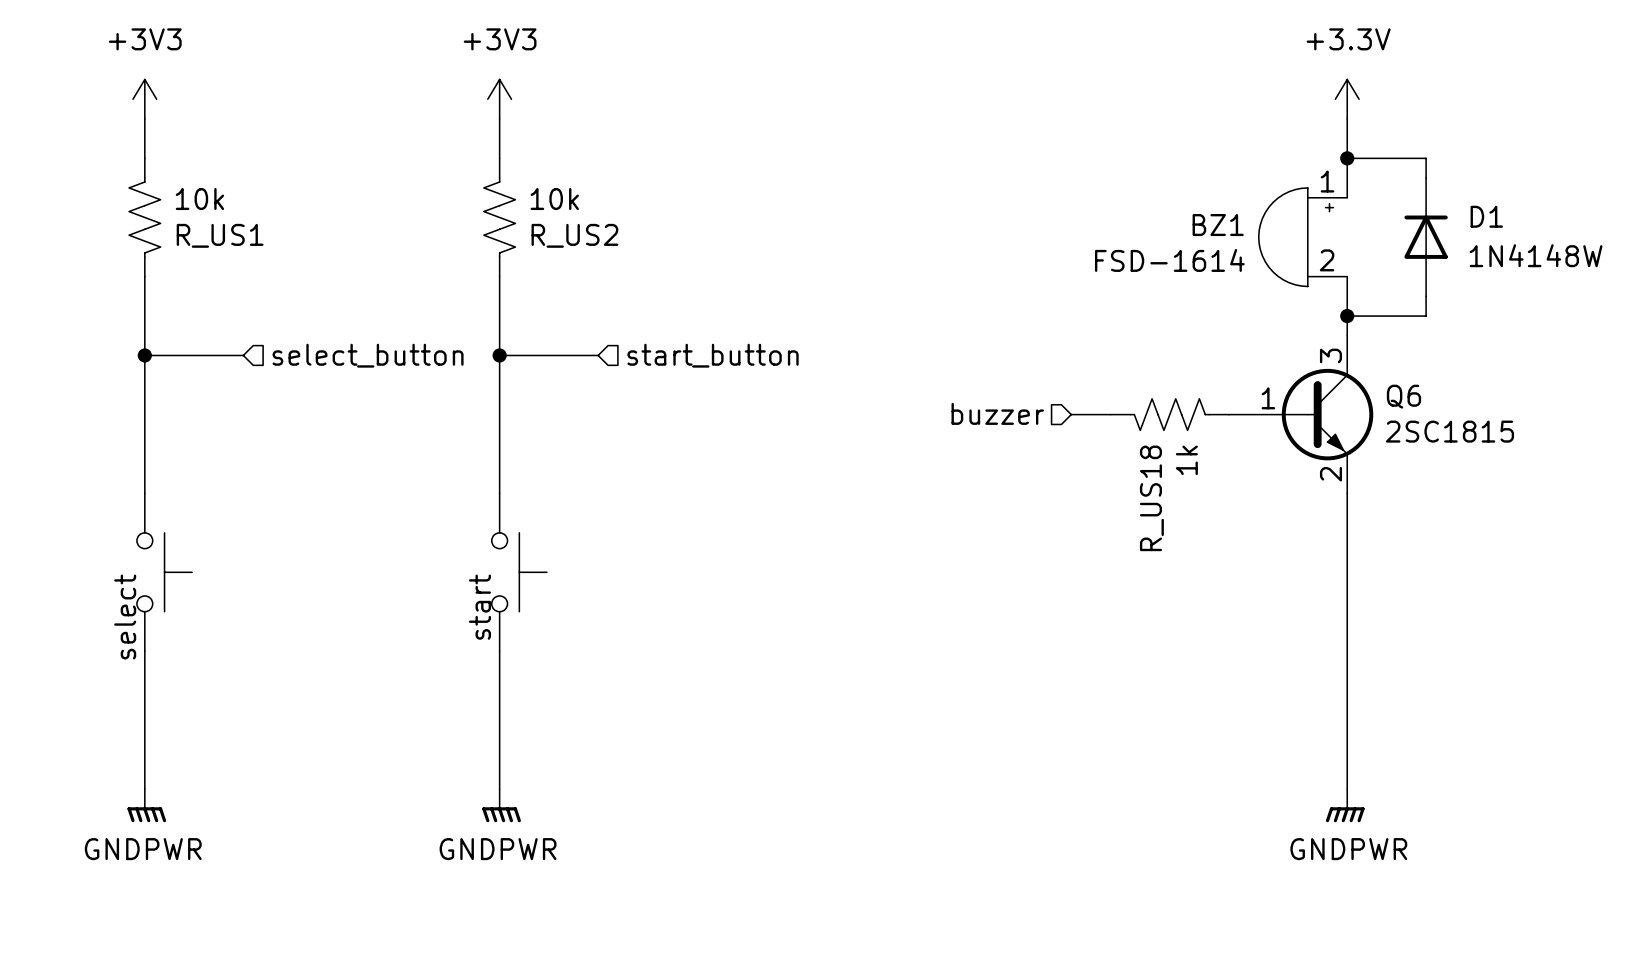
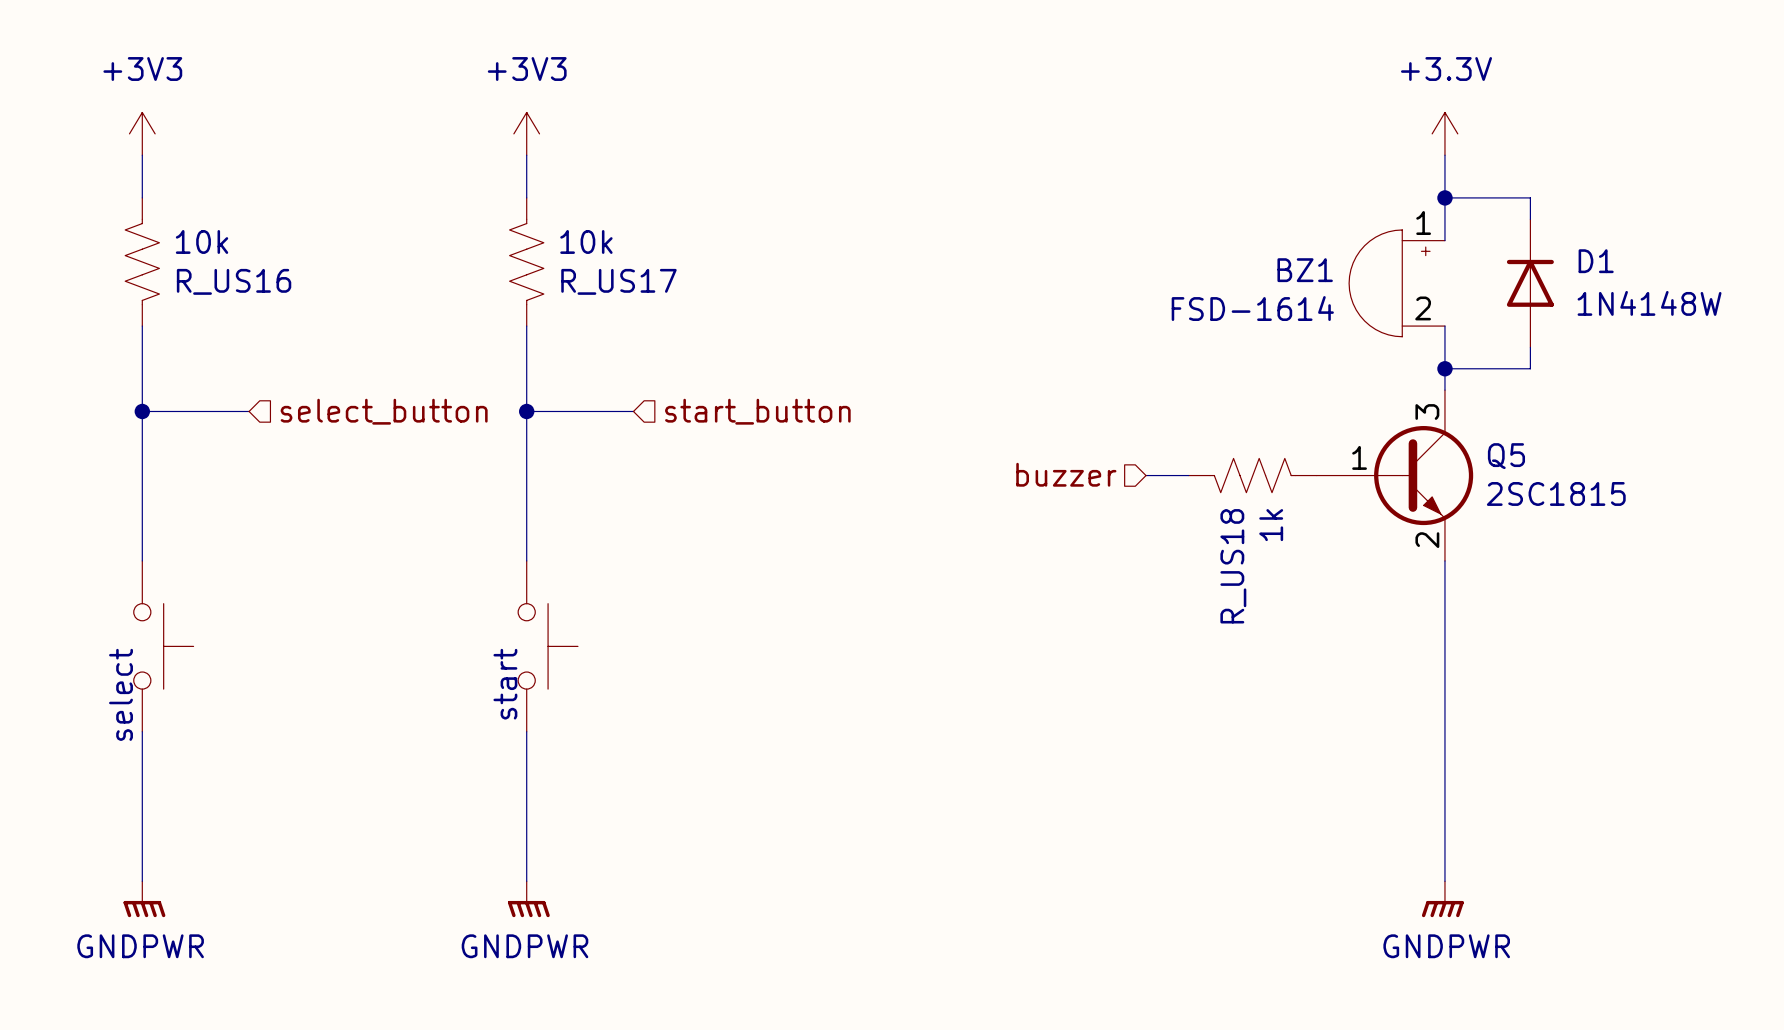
R_US1 name: R_US1 (220, 235) -> R_US16 (234, 281)
R_US2 name: R_US2 (574, 235) -> R_US17 (618, 281)
Q6 name: Q6 (1403, 396) -> Q5 (1506, 456)

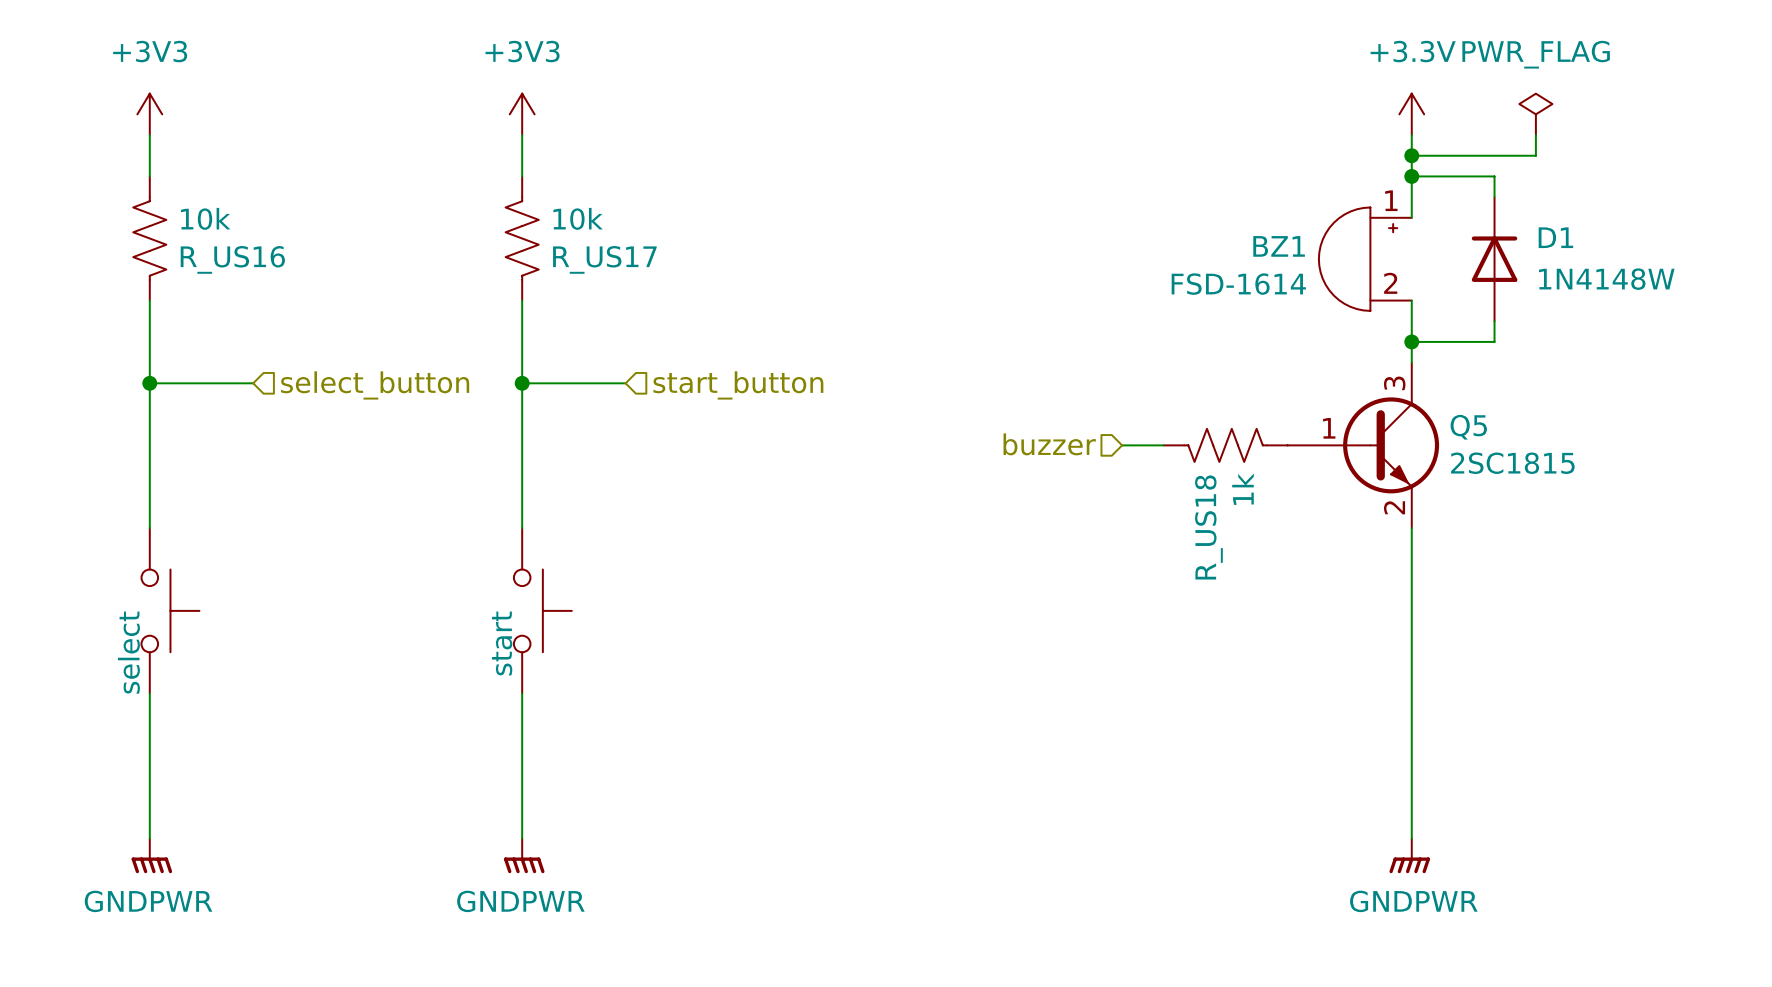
power symbol: none -> PWR_FLAG (1535, 114)
wire: none -> (1535, 135) (1535, 155) (1411, 155)
junction: none -> (1411, 155)

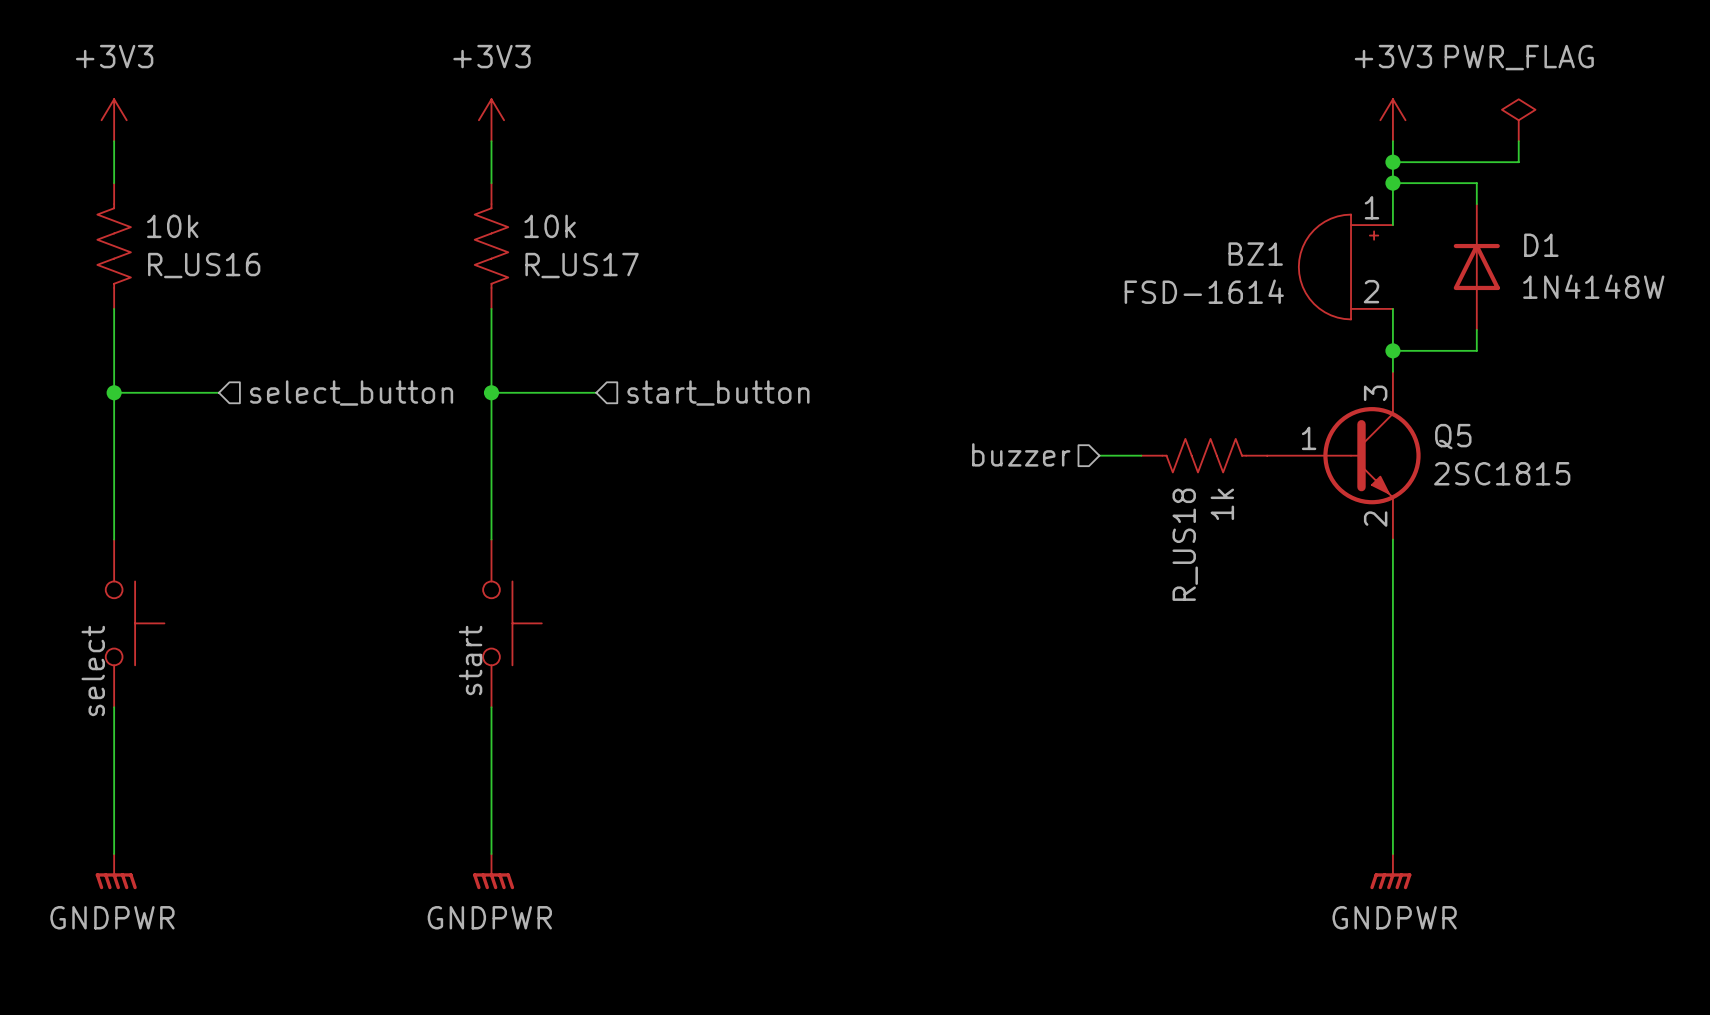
power symbol: +3.3V (1411, 114) -> +3V3 (1392, 120)

